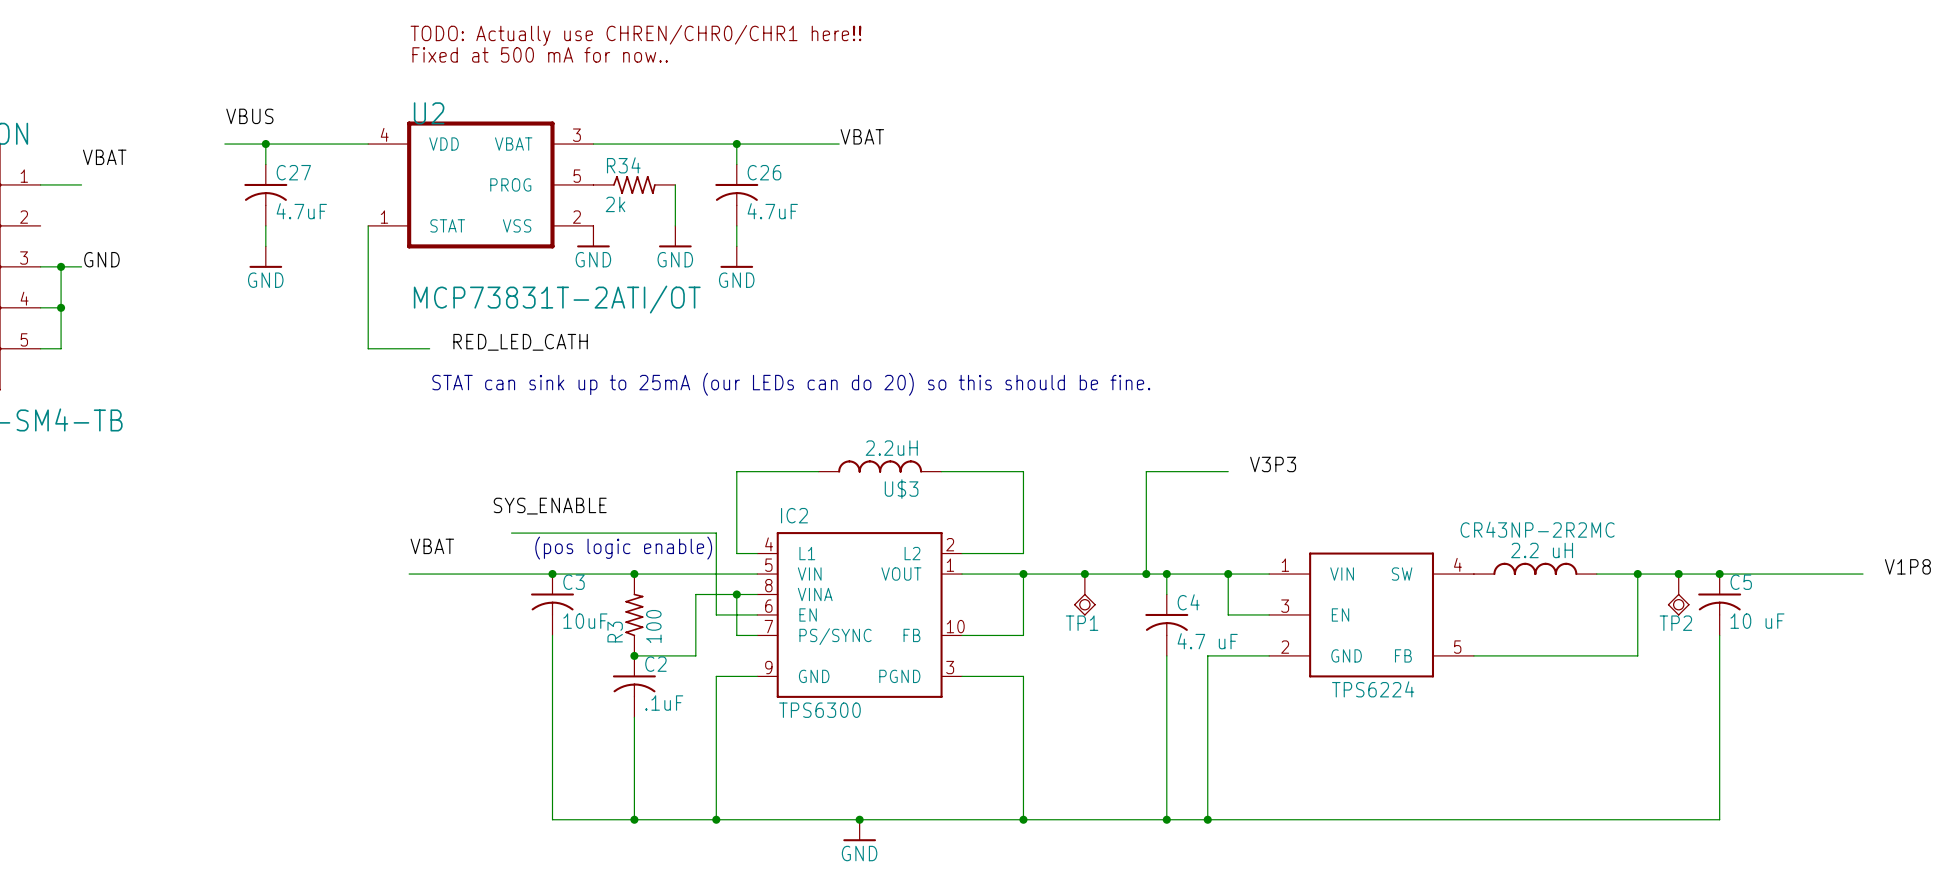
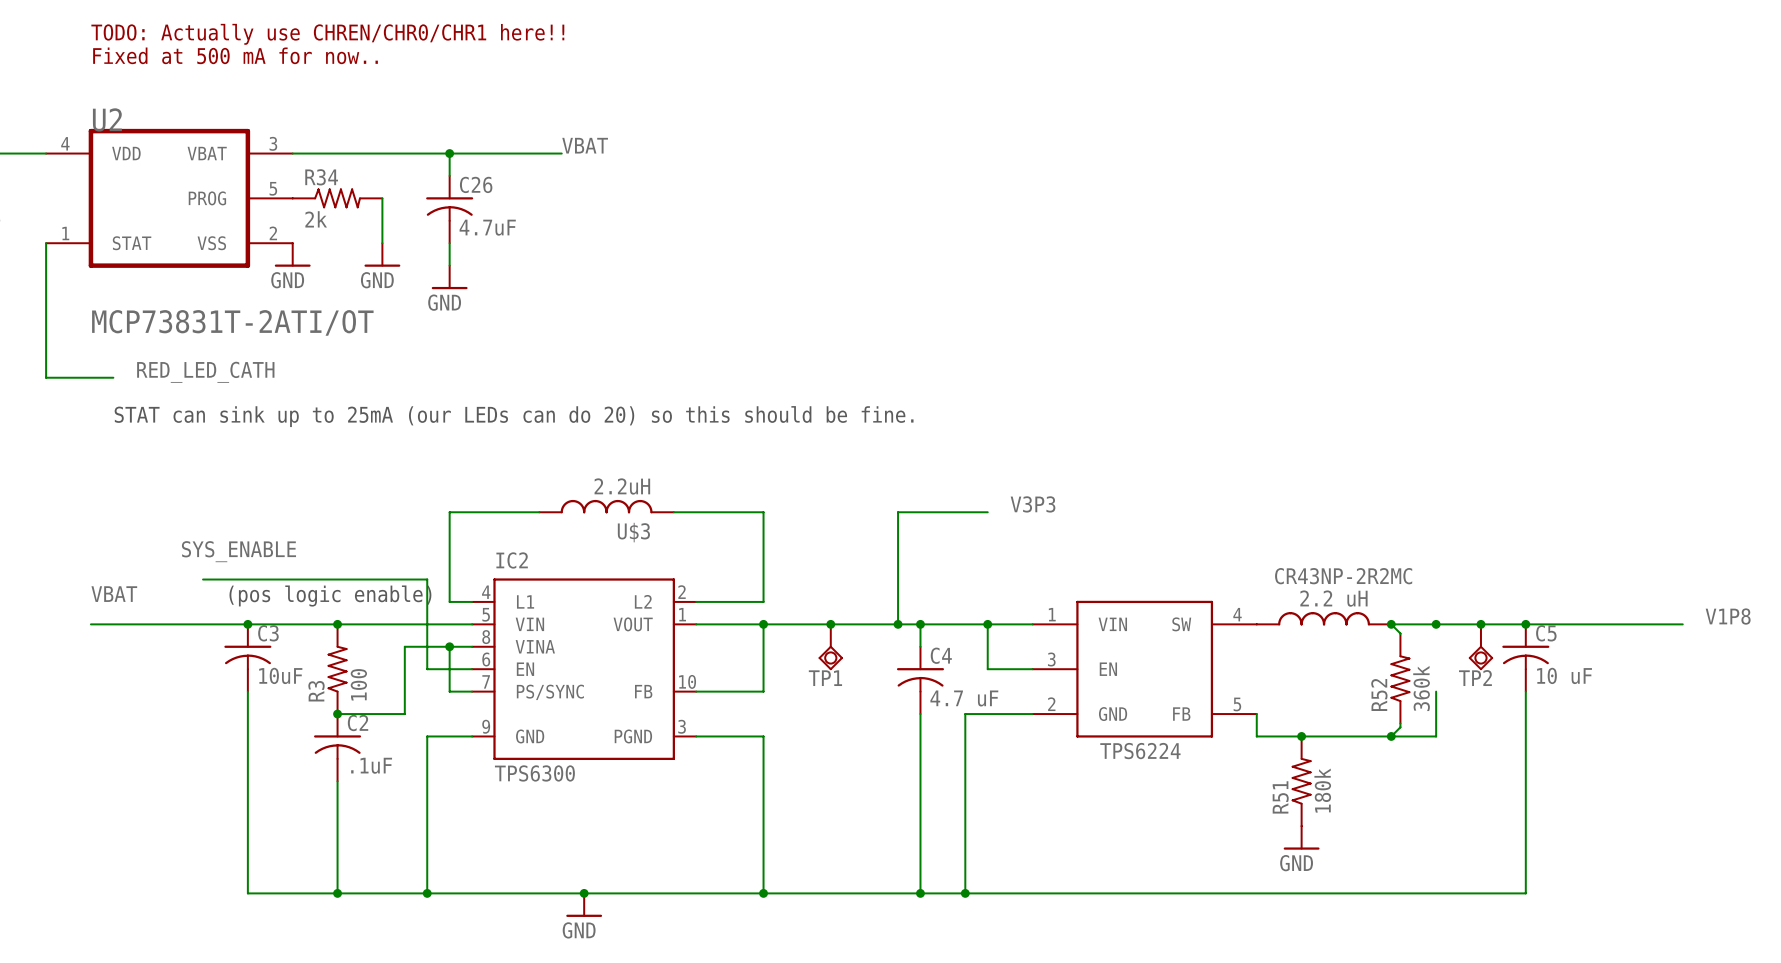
wire: none -> (1391, 624) (1400, 633)
junction: none -> (1391, 624)
wire: (1637, 574) (1637, 635) -> none
R52: none -> 360k (1400, 678)
wire: (1473, 655) (1637, 655) -> (1256, 714) (1256, 736) (1436, 736) (1436, 714)
wire: none -> (1400, 723) (1400, 727) (1391, 736)
junction: none -> (1301, 736)
junction: none -> (1391, 736)
R51: none -> 180k (1301, 781)
power symbol: none -> GND (1301, 837)

